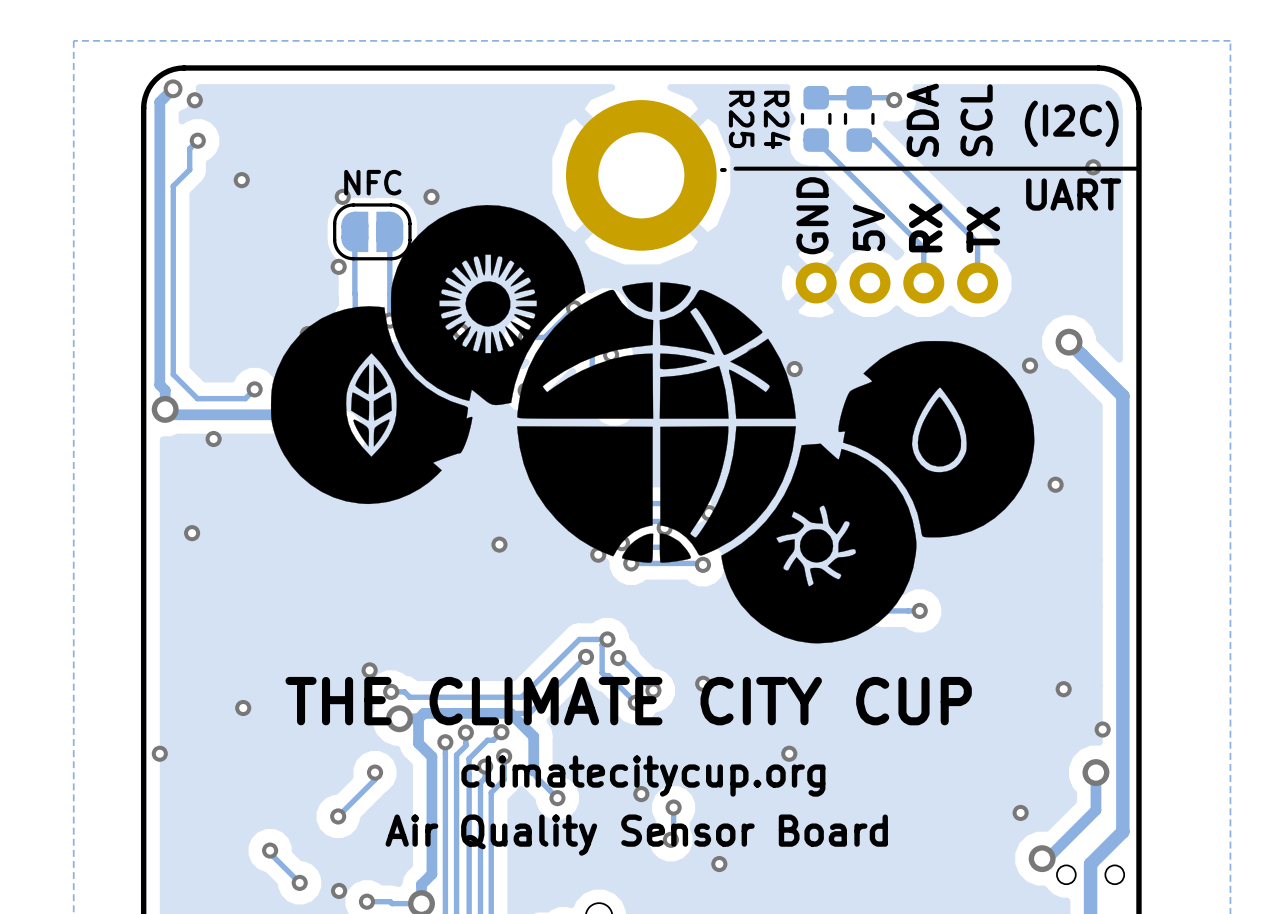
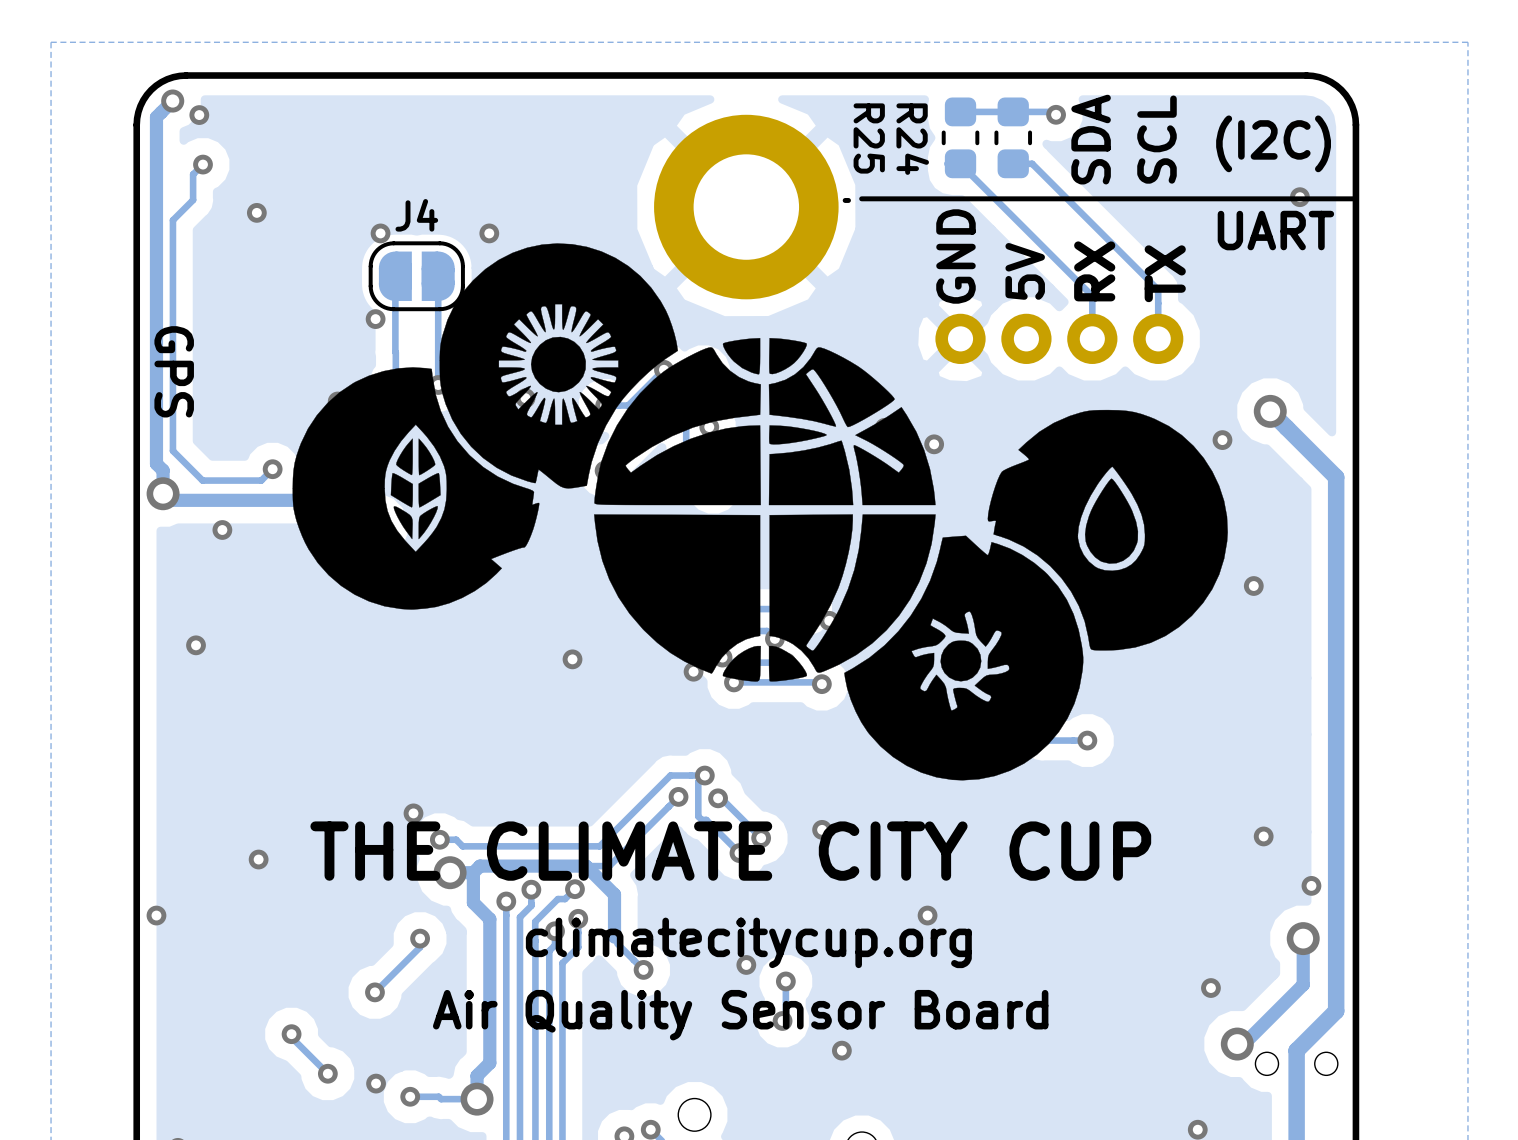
NFC name: NFC (372, 182) -> J4 (416, 215)
text: none -> GPS (174, 371)

